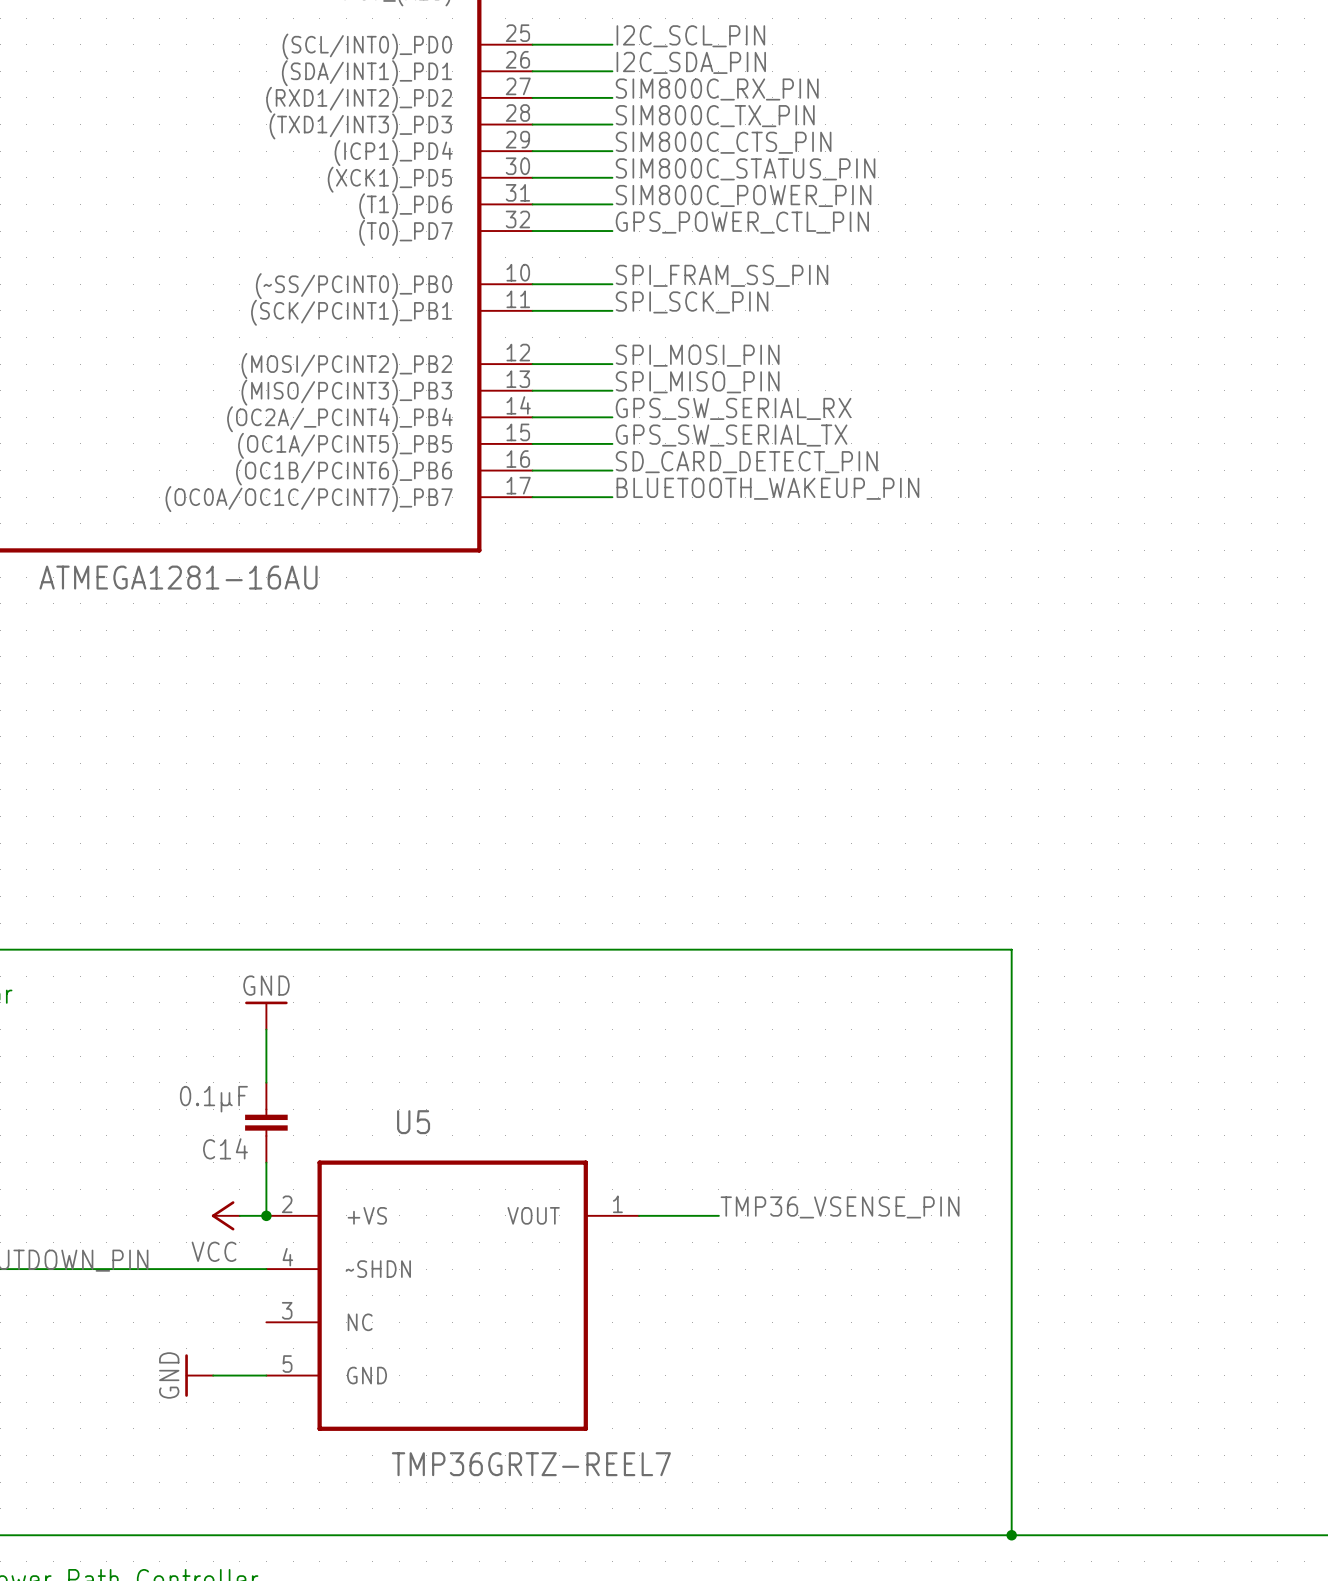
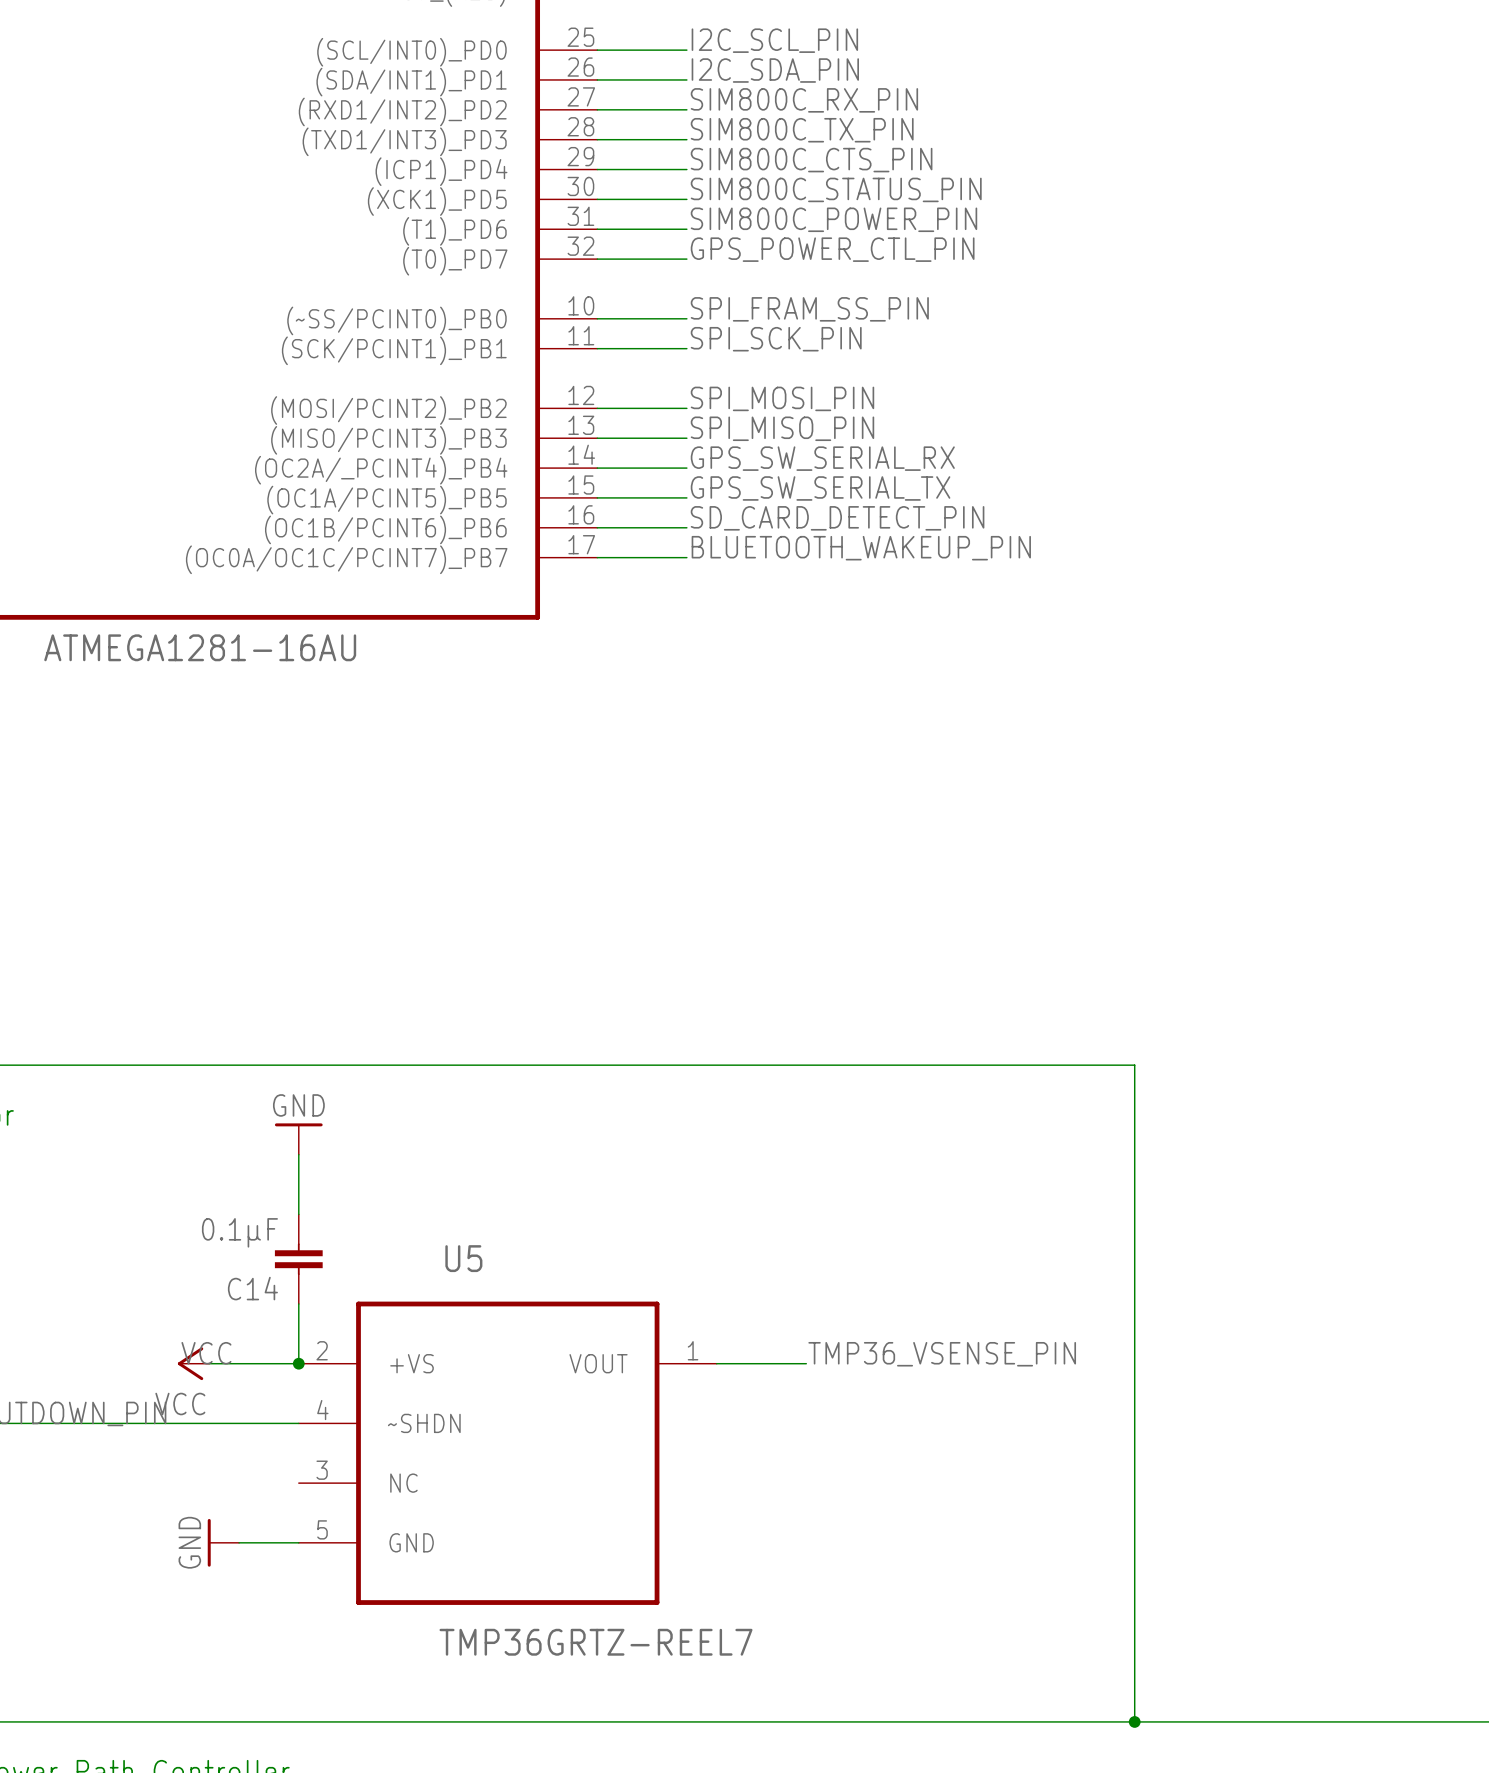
label: none -> VCC (206, 1353)
power symbol position: VCC (225, 1215) -> VCC (193, 1363)

